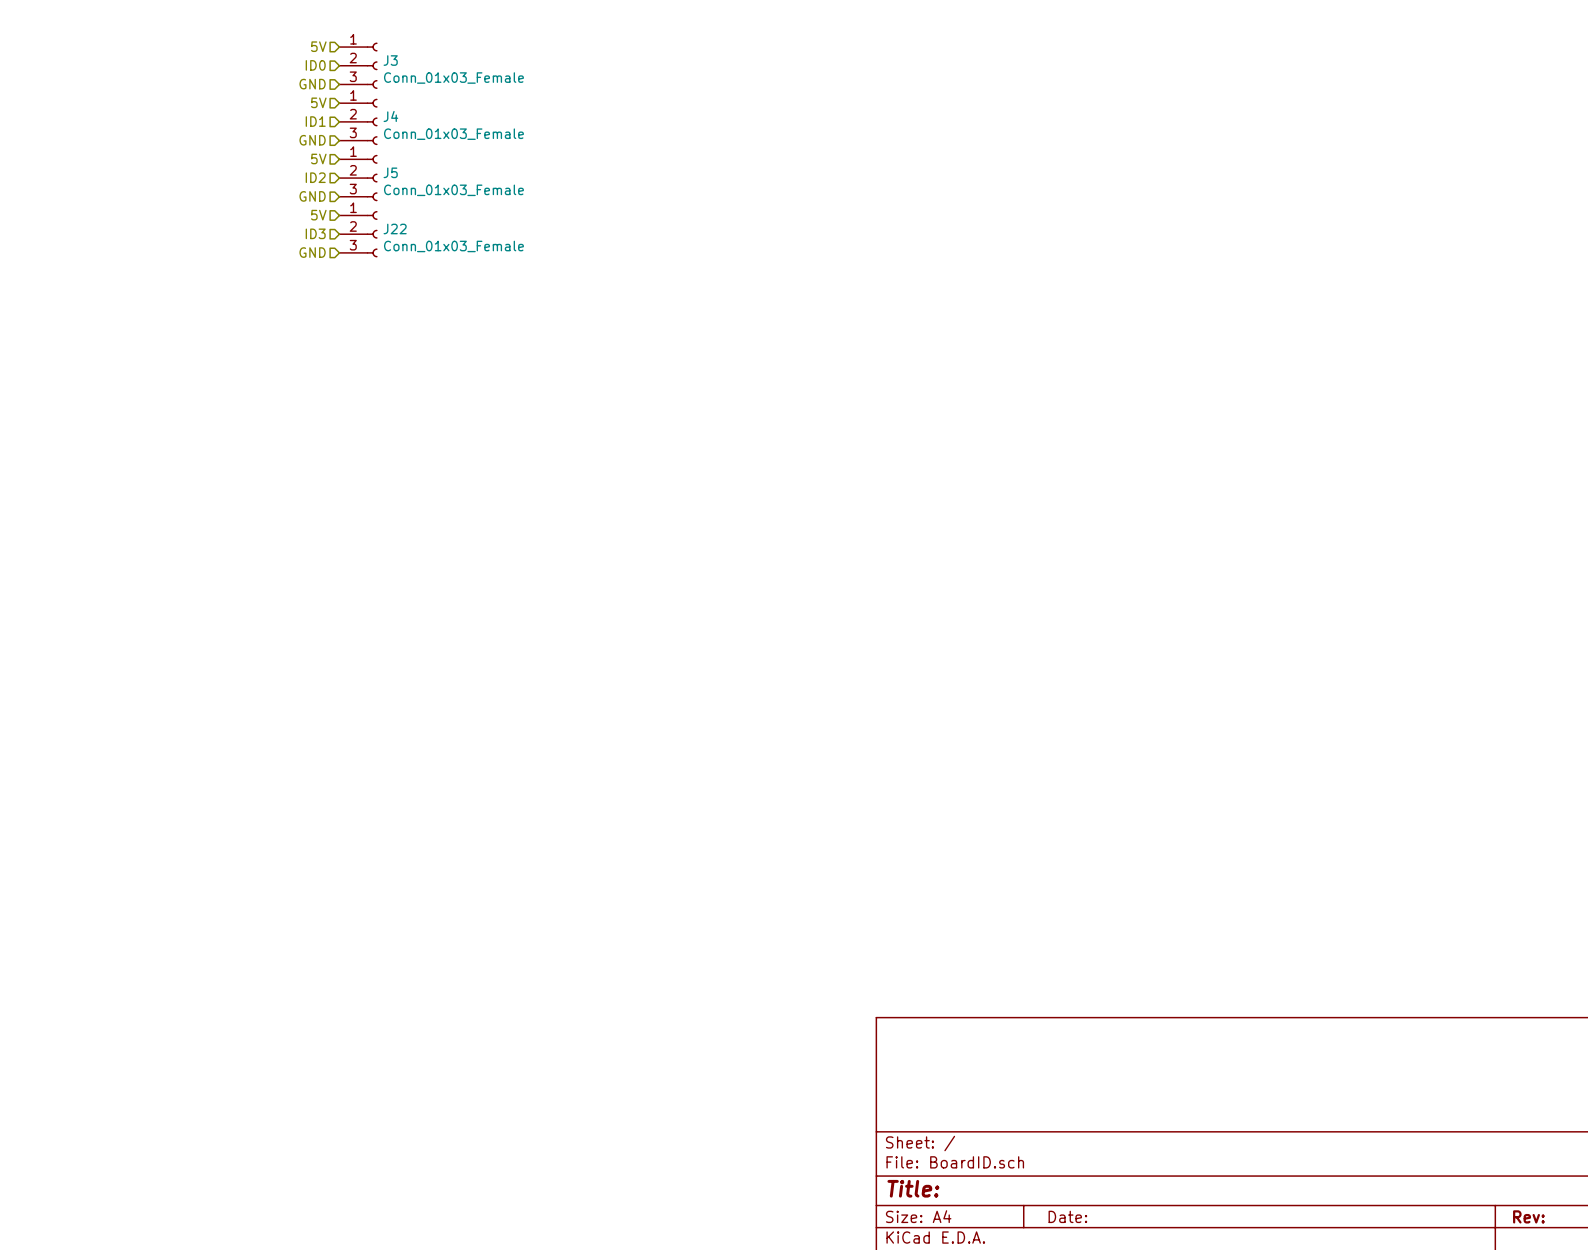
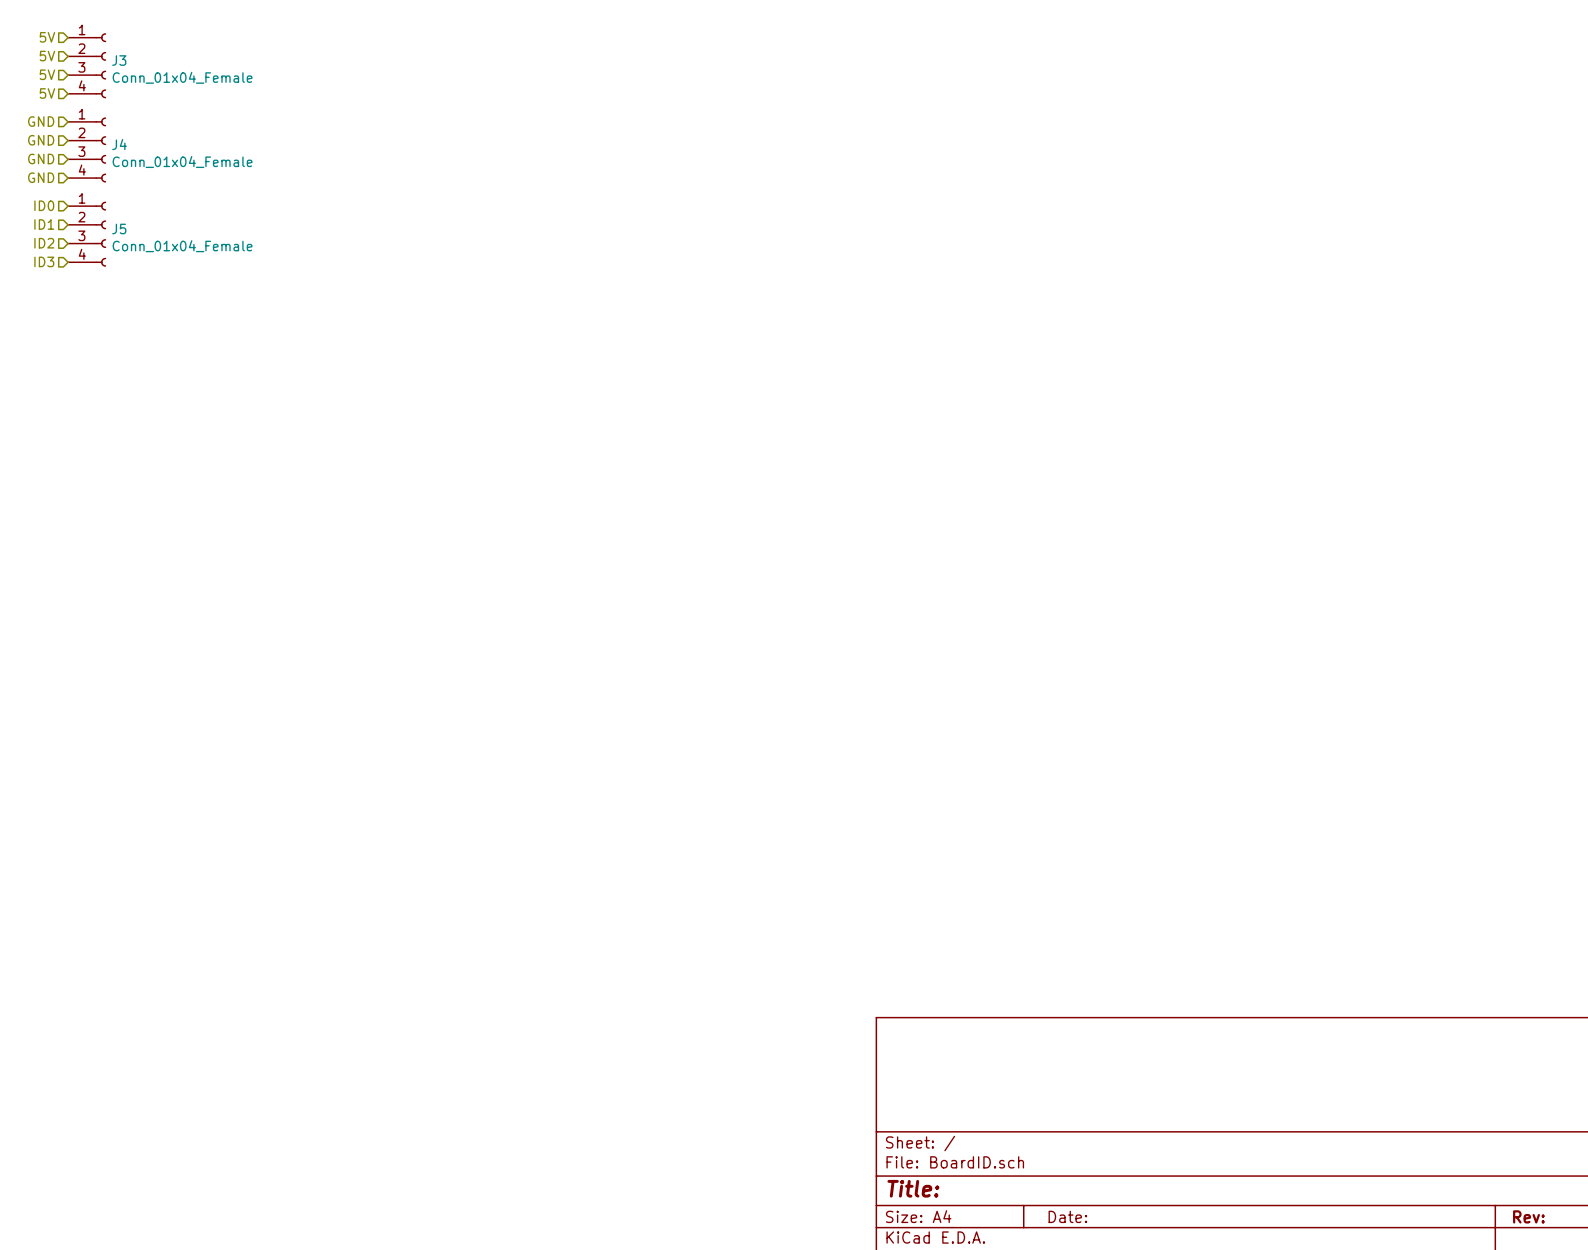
hierarchical label: none -> 5V (47, 37)
J3 symbol: [339, 42, 378, 89] -> [68, 33, 107, 99]
hierarchical label: 5V (318, 46) -> none
hierarchical label: none -> 5V (47, 56)
hierarchical label: ID0 (315, 65) -> none
hierarchical label: none -> 5V (47, 74)
J3 value: Conn_01x03_Female (453, 78) -> Conn_01x04_Female (182, 77)
hierarchical label: GND (312, 84) -> none
hierarchical label: none -> 5V (47, 93)
J4 symbol: [339, 98, 378, 145] -> [68, 117, 107, 183]
hierarchical label: 5V (318, 102) -> none
hierarchical label: none -> GND (41, 121)
hierarchical label: ID1 (315, 121) -> none
J4 value: Conn_01x03_Female (453, 134) -> Conn_01x04_Female (182, 162)
hierarchical label: none -> GND (41, 140)
hierarchical label: GND (312, 140) -> none
J5 symbol: [339, 155, 378, 202] -> [68, 201, 107, 267]
hierarchical label: none -> GND (41, 158)
hierarchical label: 5V (318, 158) -> none
hierarchical label: none -> GND (41, 177)
hierarchical label: ID2 (315, 177) -> none
J5 value: Conn_01x03_Female (453, 190) -> Conn_01x04_Female (182, 246)
hierarchical label: GND (312, 196) -> none
hierarchical label: none -> ID0 (44, 205)
hierarchical label: 5V (318, 215) -> none
hierarchical label: none -> ID1 (44, 224)
hierarchical label: ID3 (315, 233) -> none
J22: Conn_01x03_Female (358, 234) -> none
hierarchical label: none -> ID2 (44, 243)
hierarchical label: GND (312, 252) -> none
hierarchical label: none -> ID3 (44, 261)

